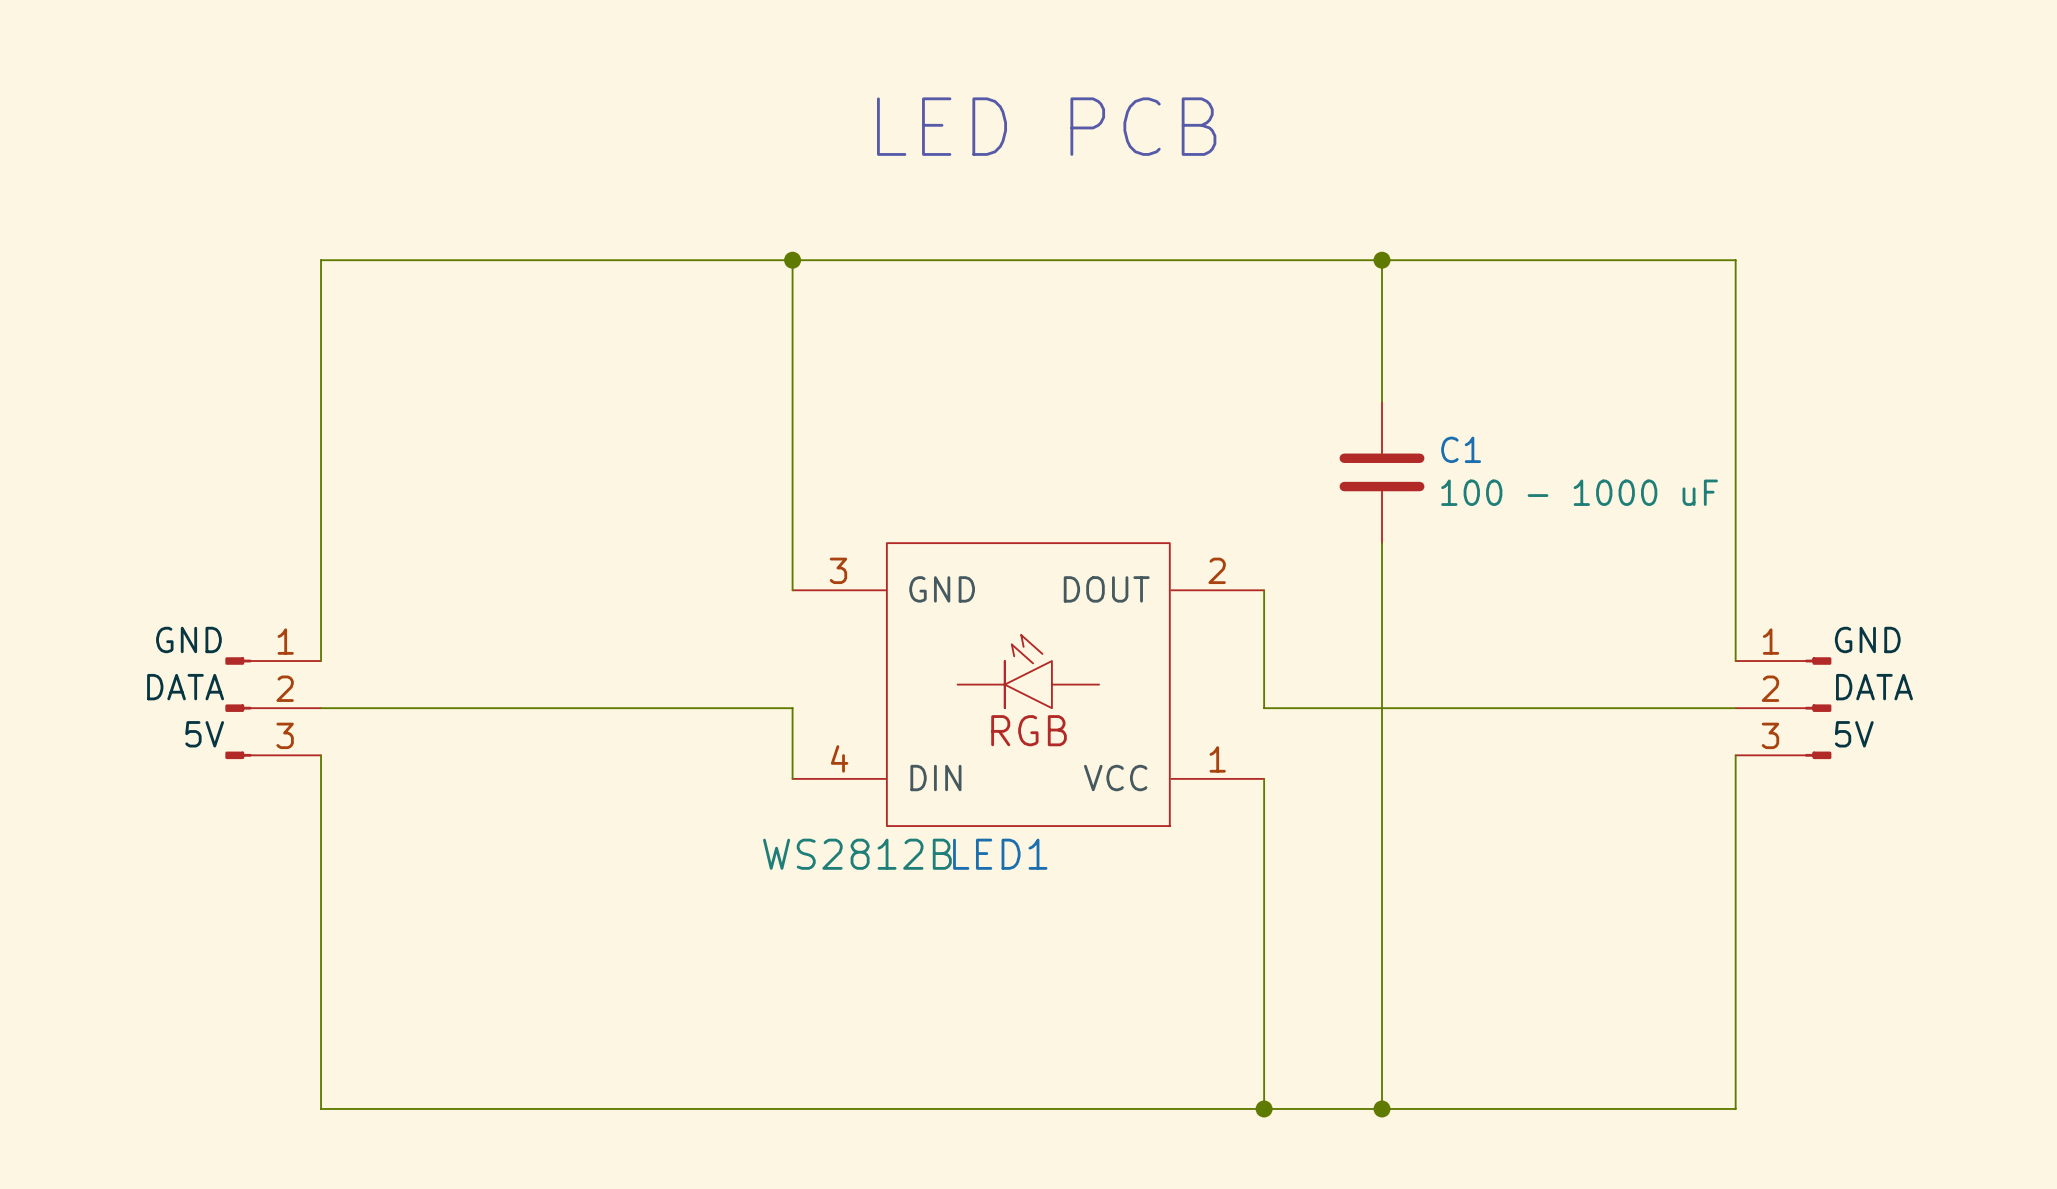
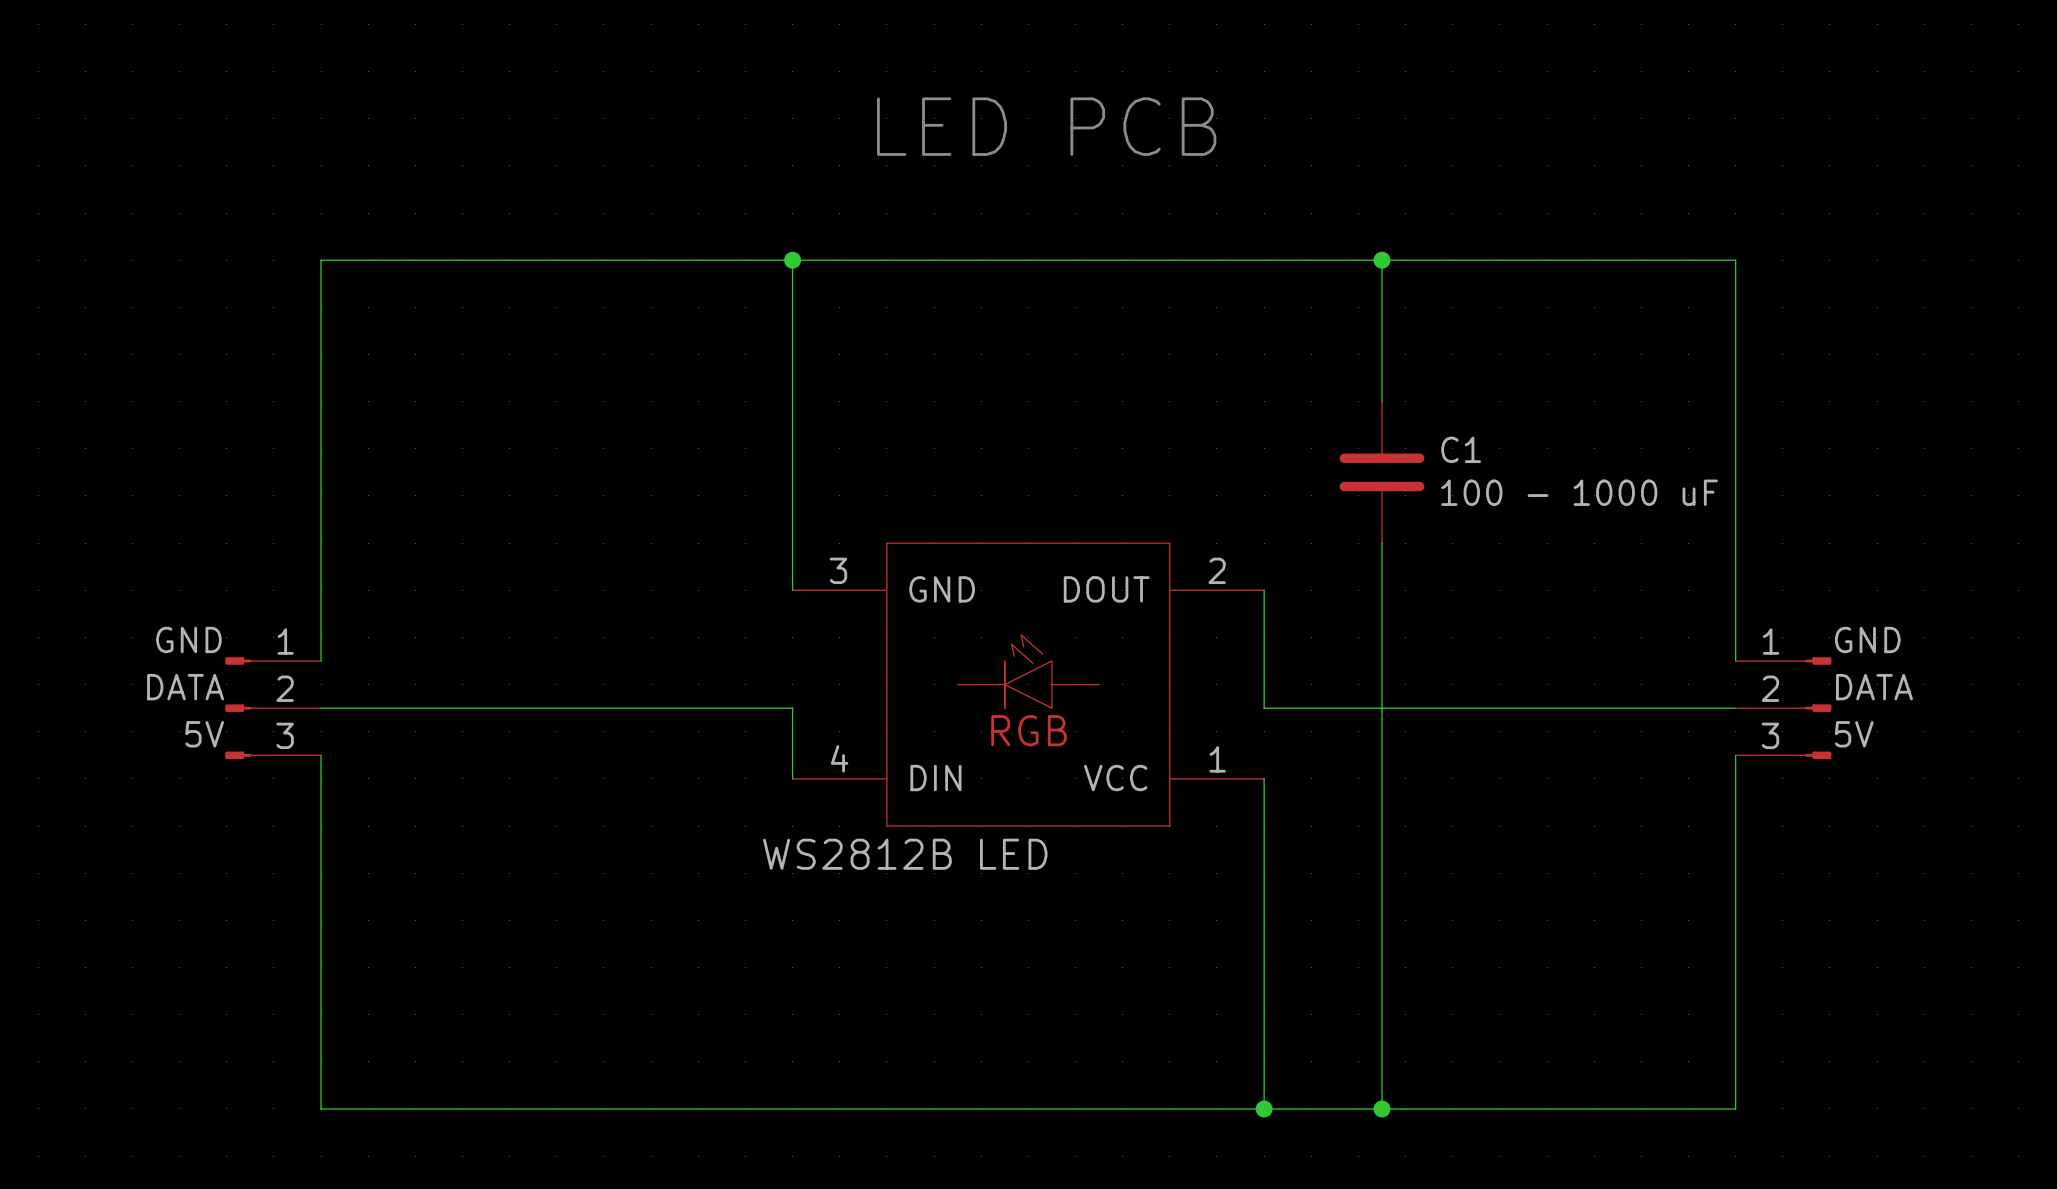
LED1 name: LED1 (1000, 854) -> LED (1013, 854)

